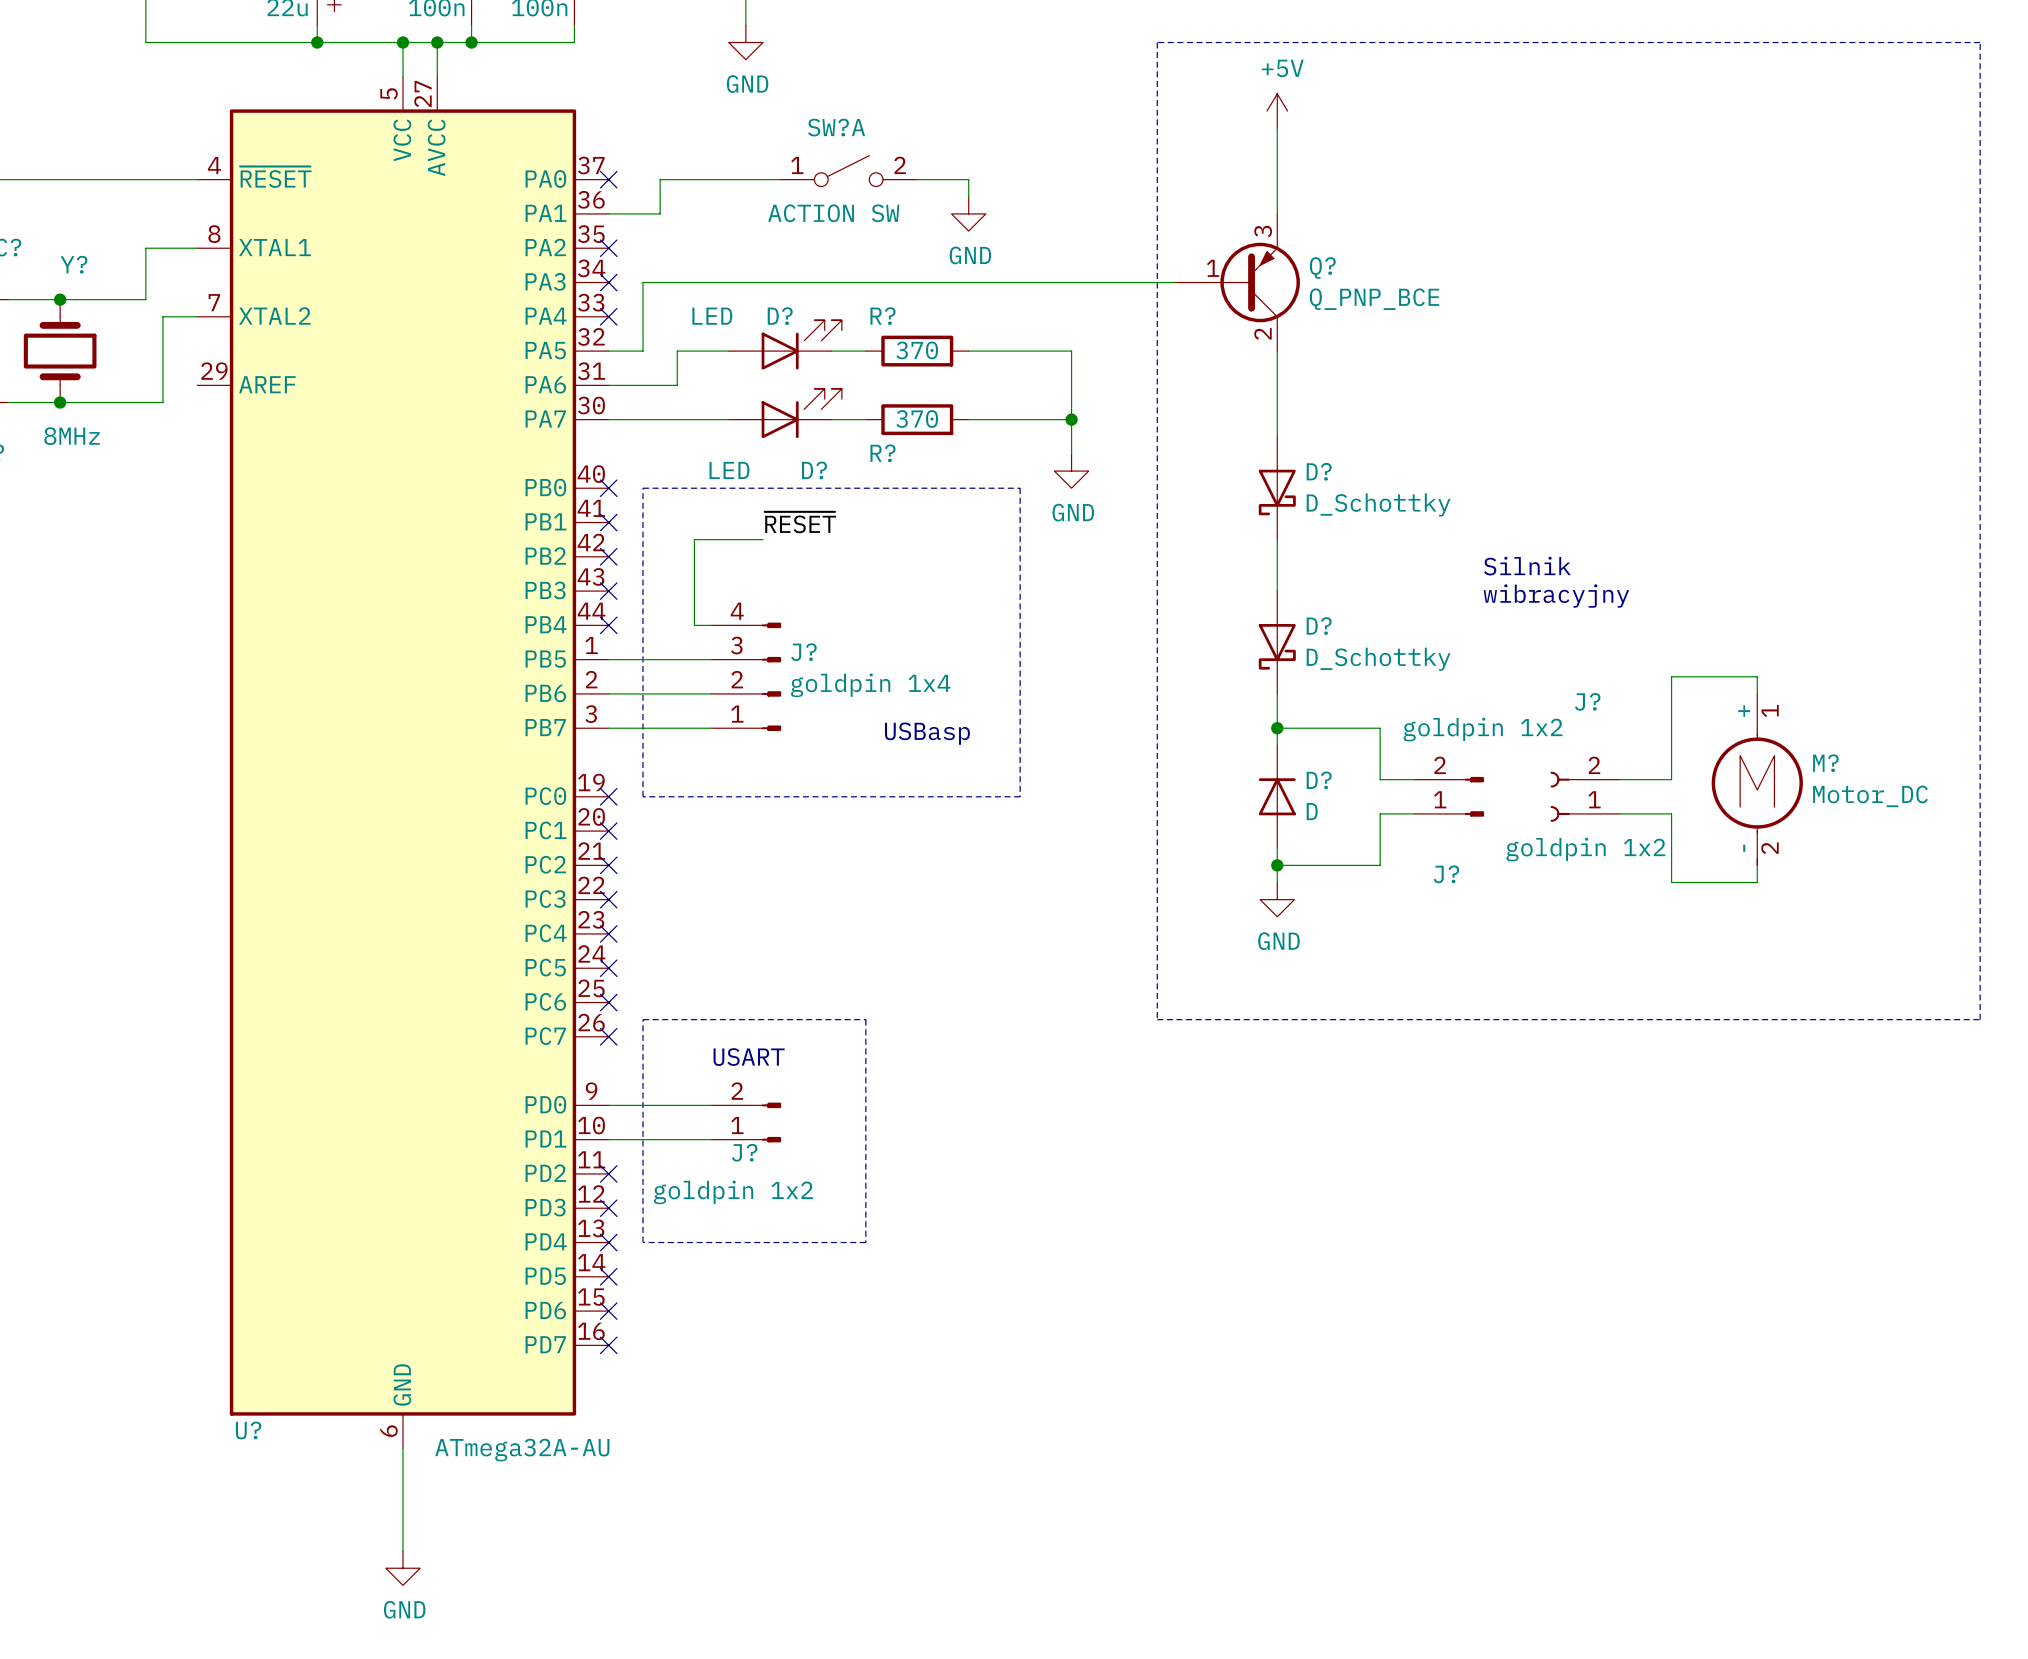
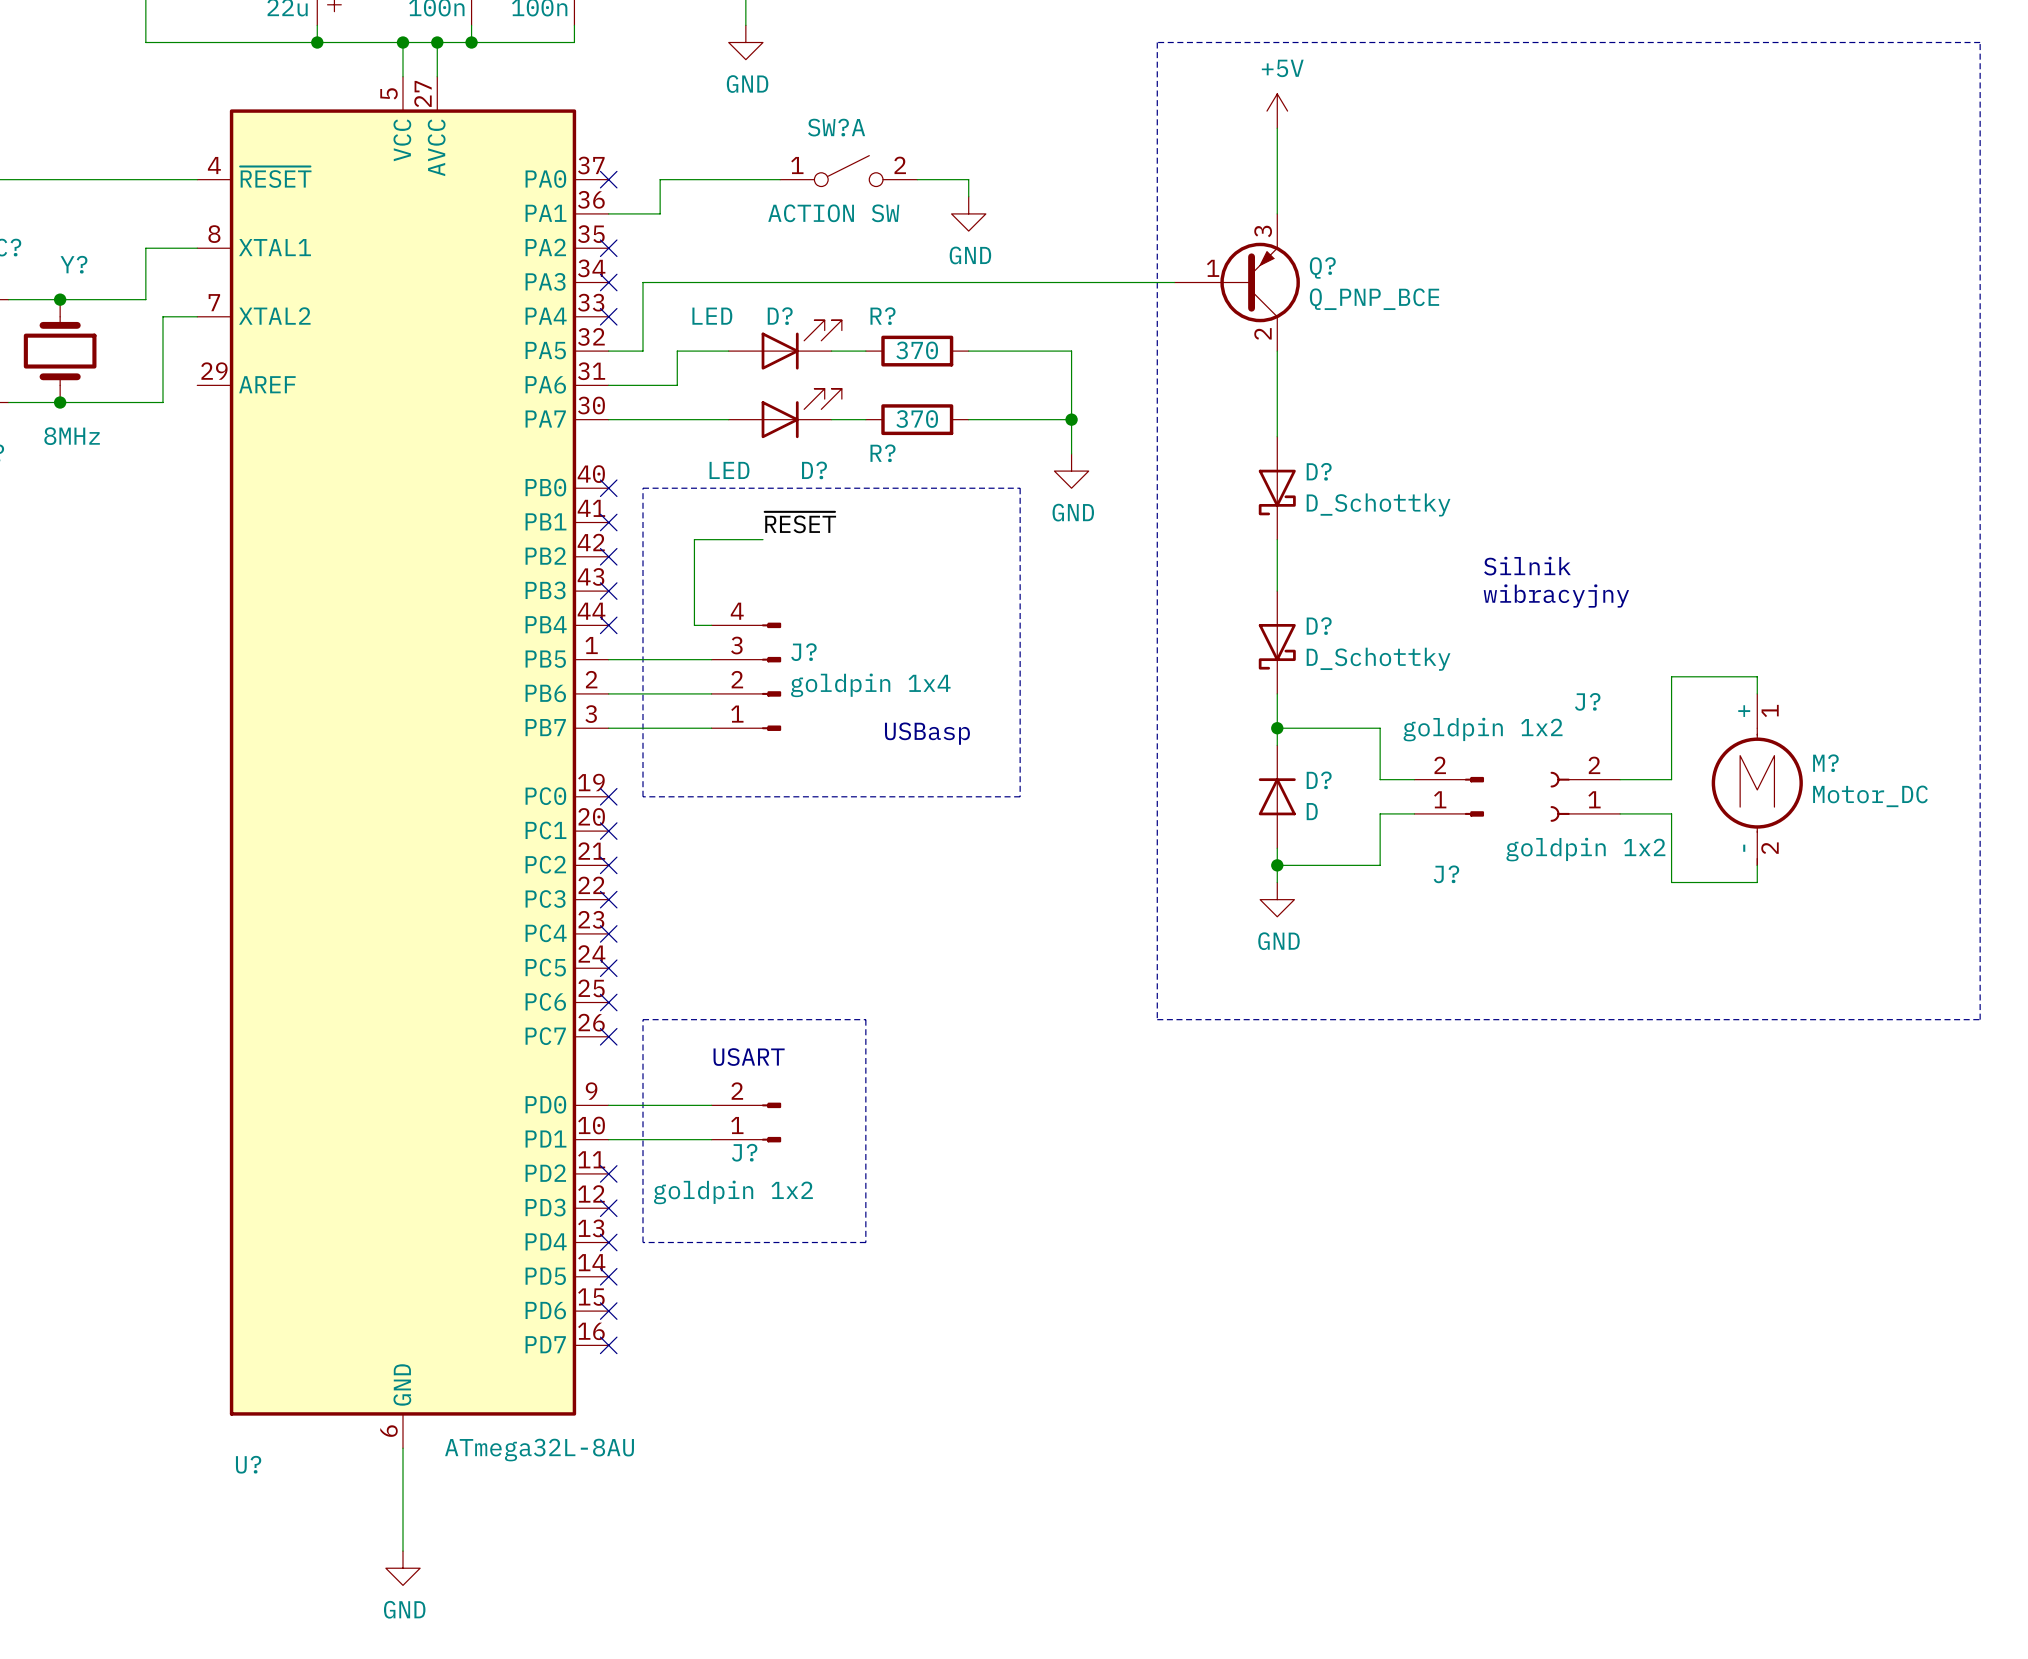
U? name position: U? (248, 1430) -> U? (248, 1464)
U? value: ATmega32A-AU (522, 1450) -> ATmega32L-8AU (539, 1450)

